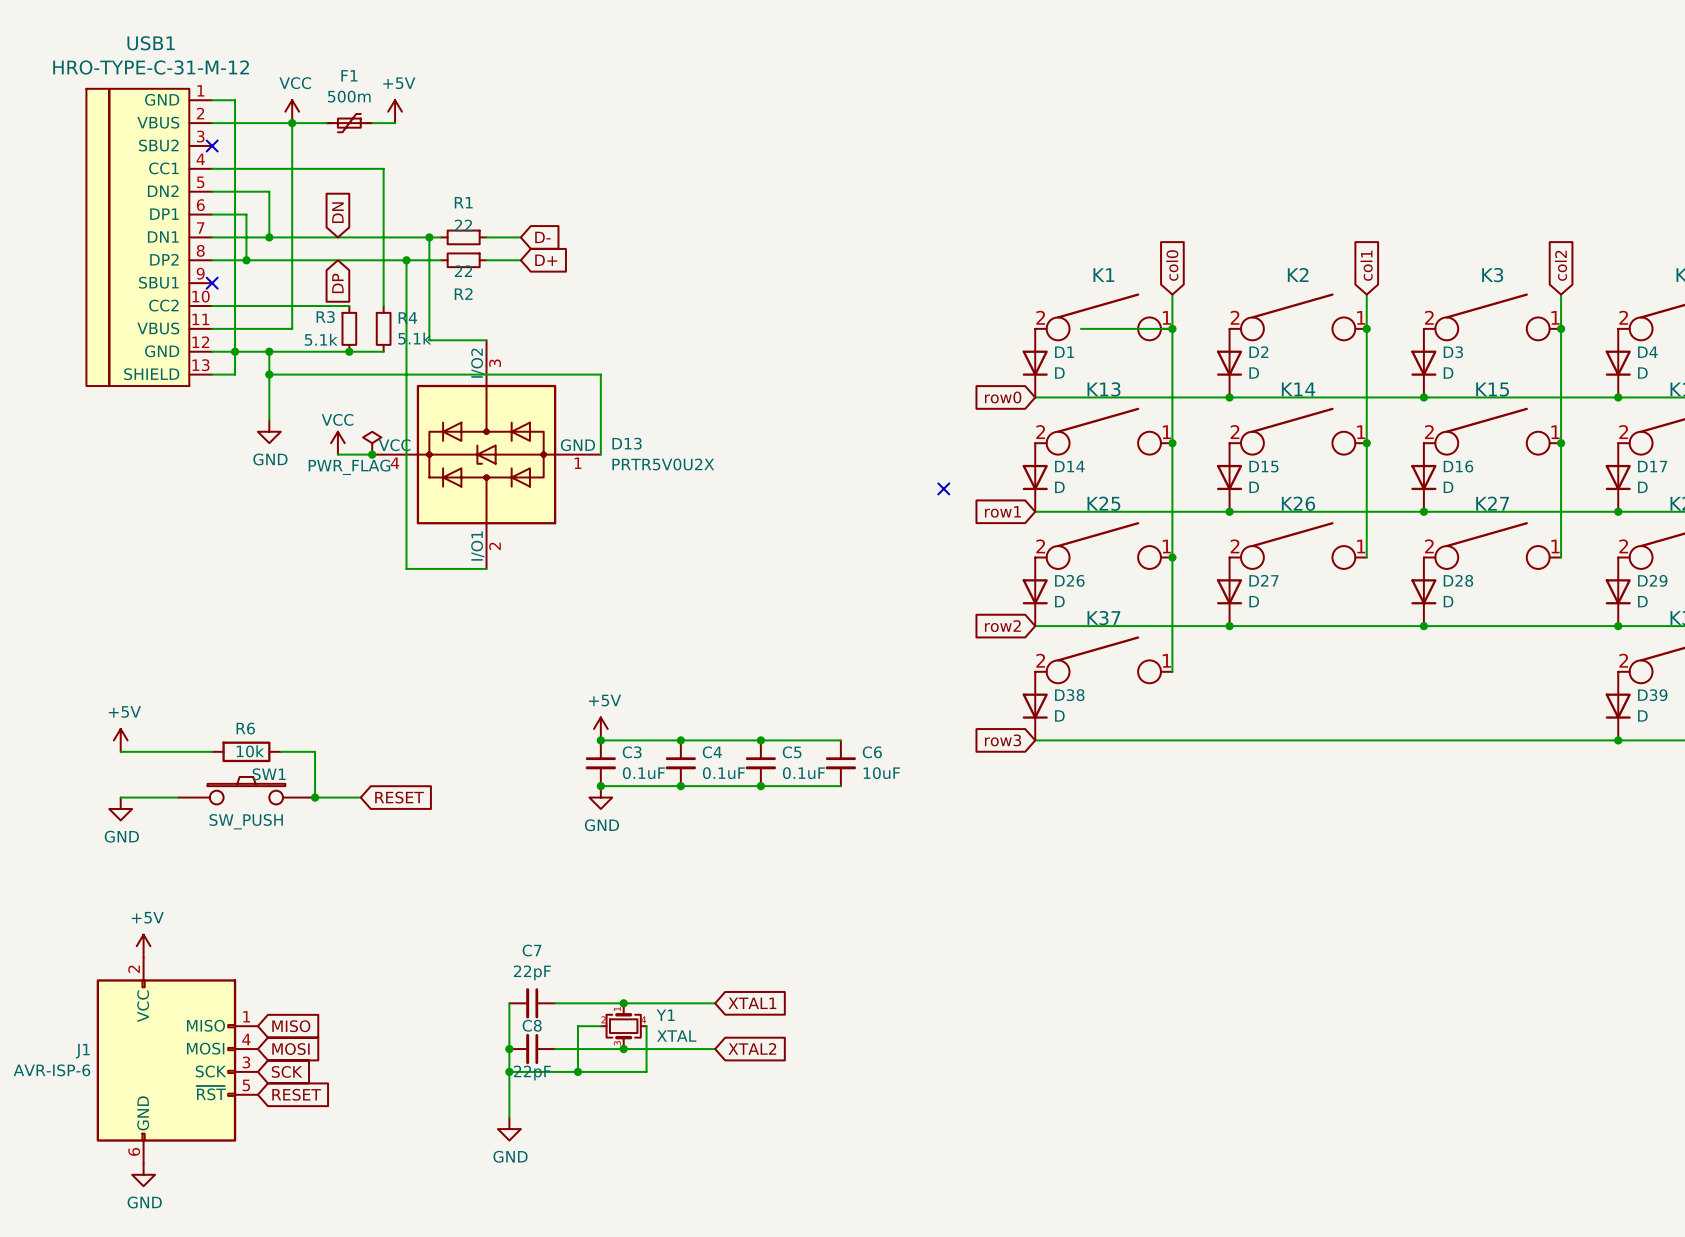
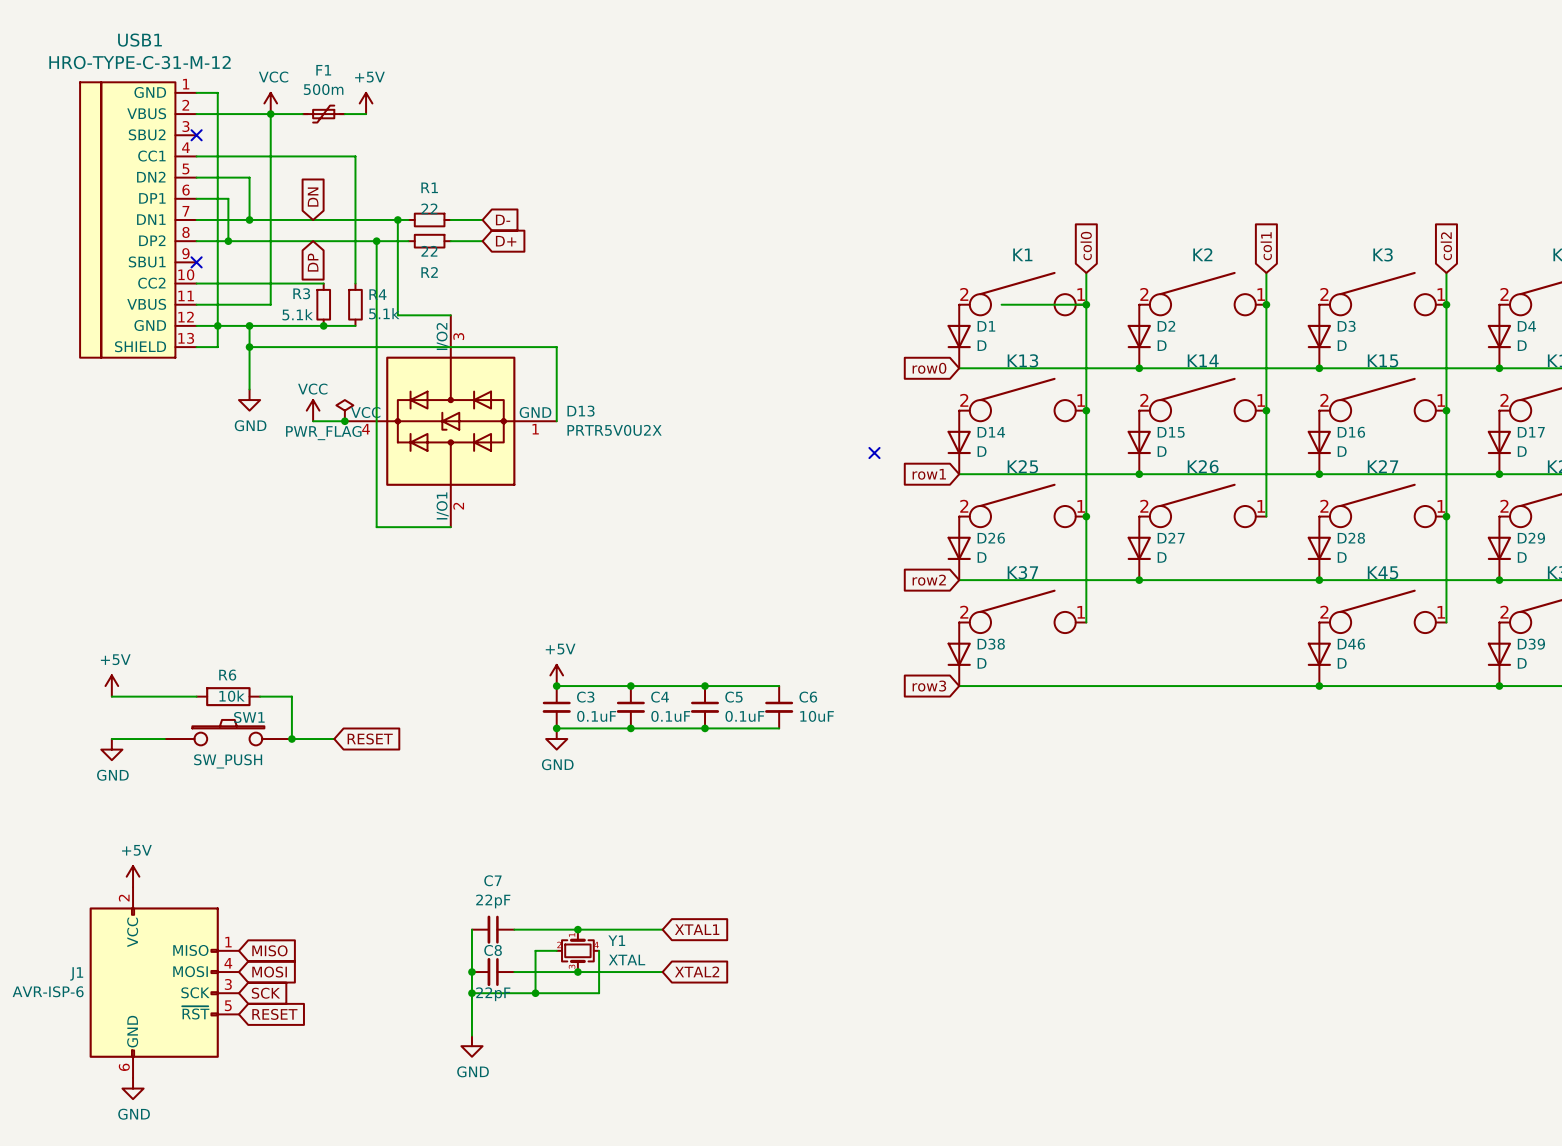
wire: none -> (1446, 516) (1446, 622)
junction: none -> (1446, 516)
K45: none -> (1382, 611)
D46: none -> D (1319, 654)
junction: none -> (1319, 686)

